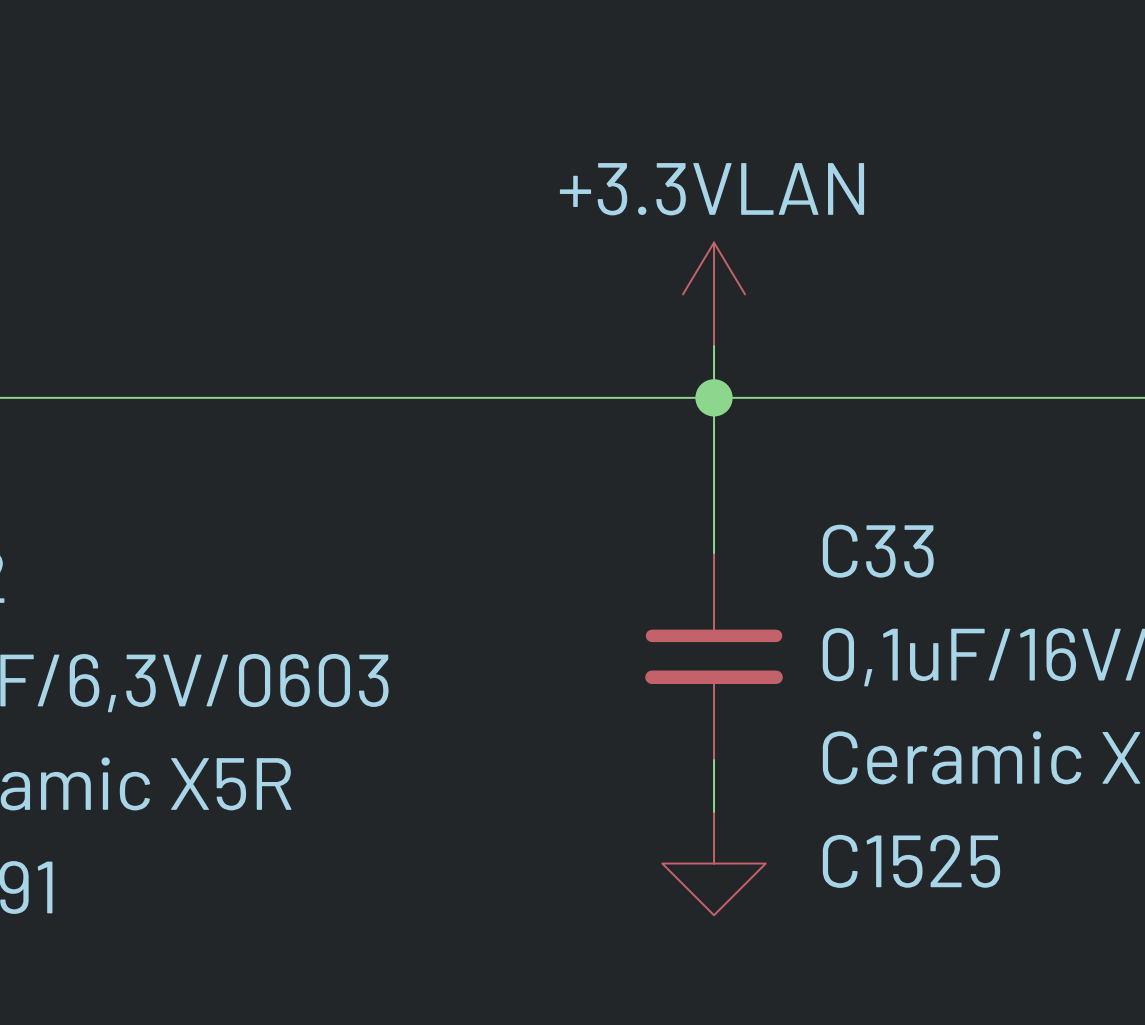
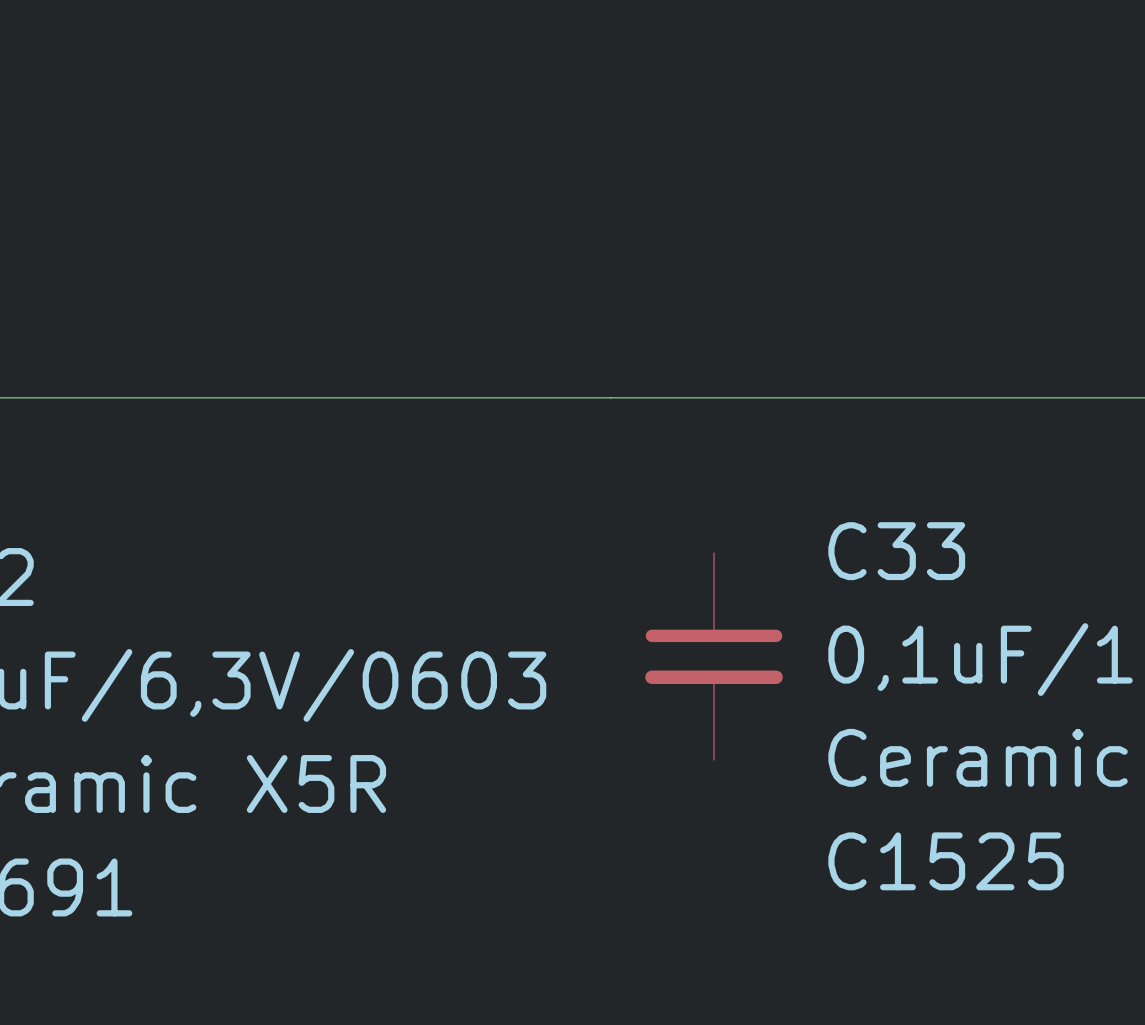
power symbol: +3.3VLAN (714, 294) -> none
wire: (714, 346) (714, 553) -> none
junction: (714, 397) -> none
wire: (714, 760) (714, 811) -> none
power symbol: (714, 863) -> none

